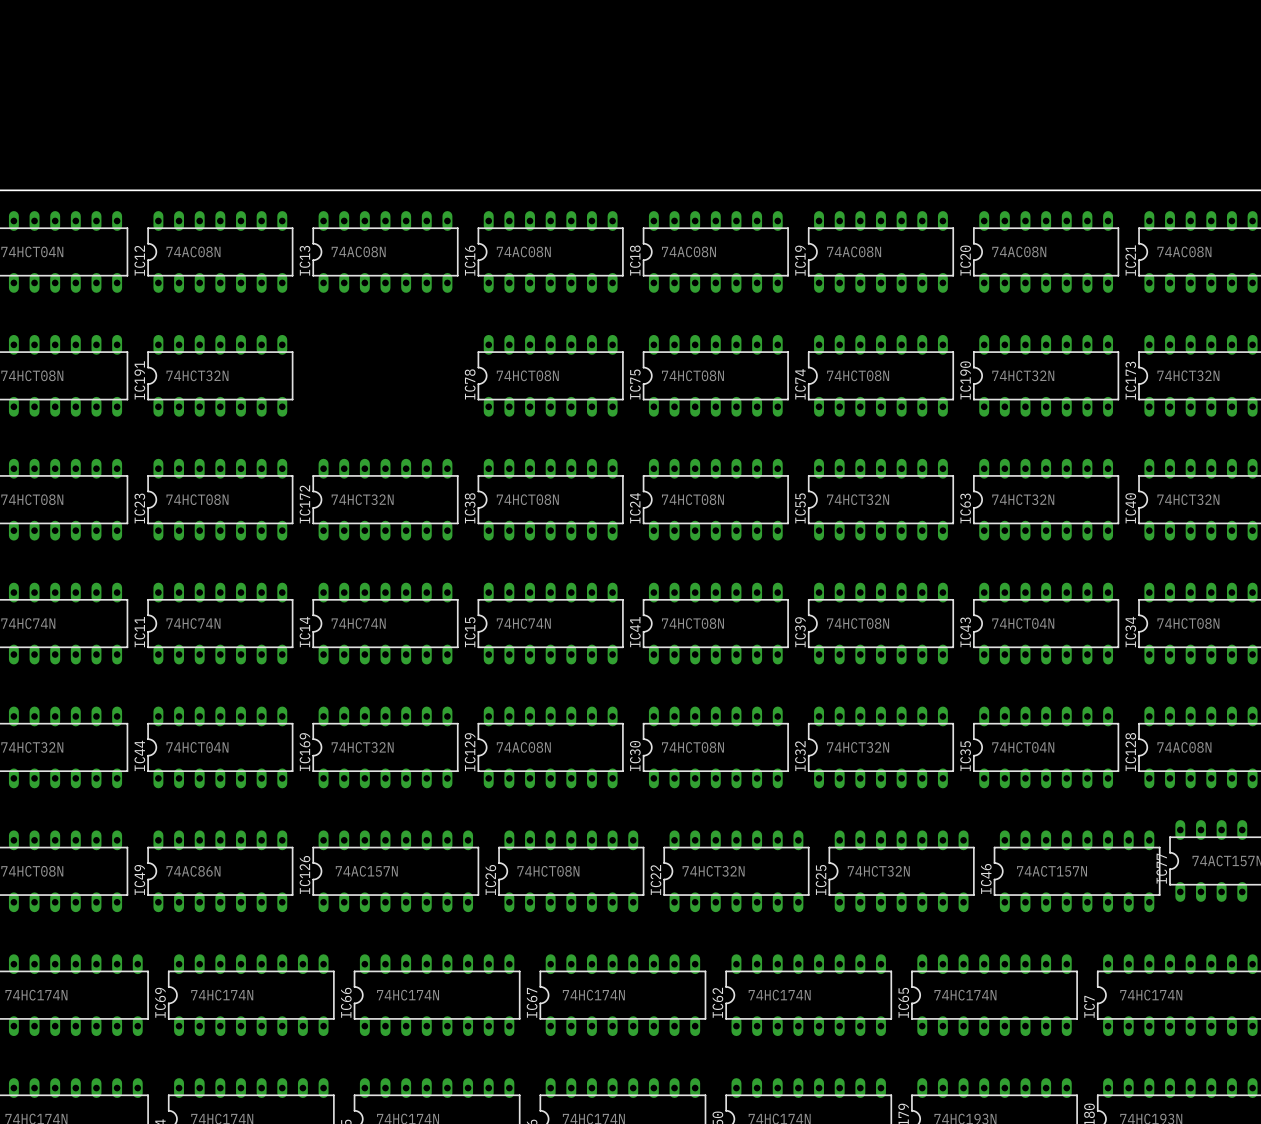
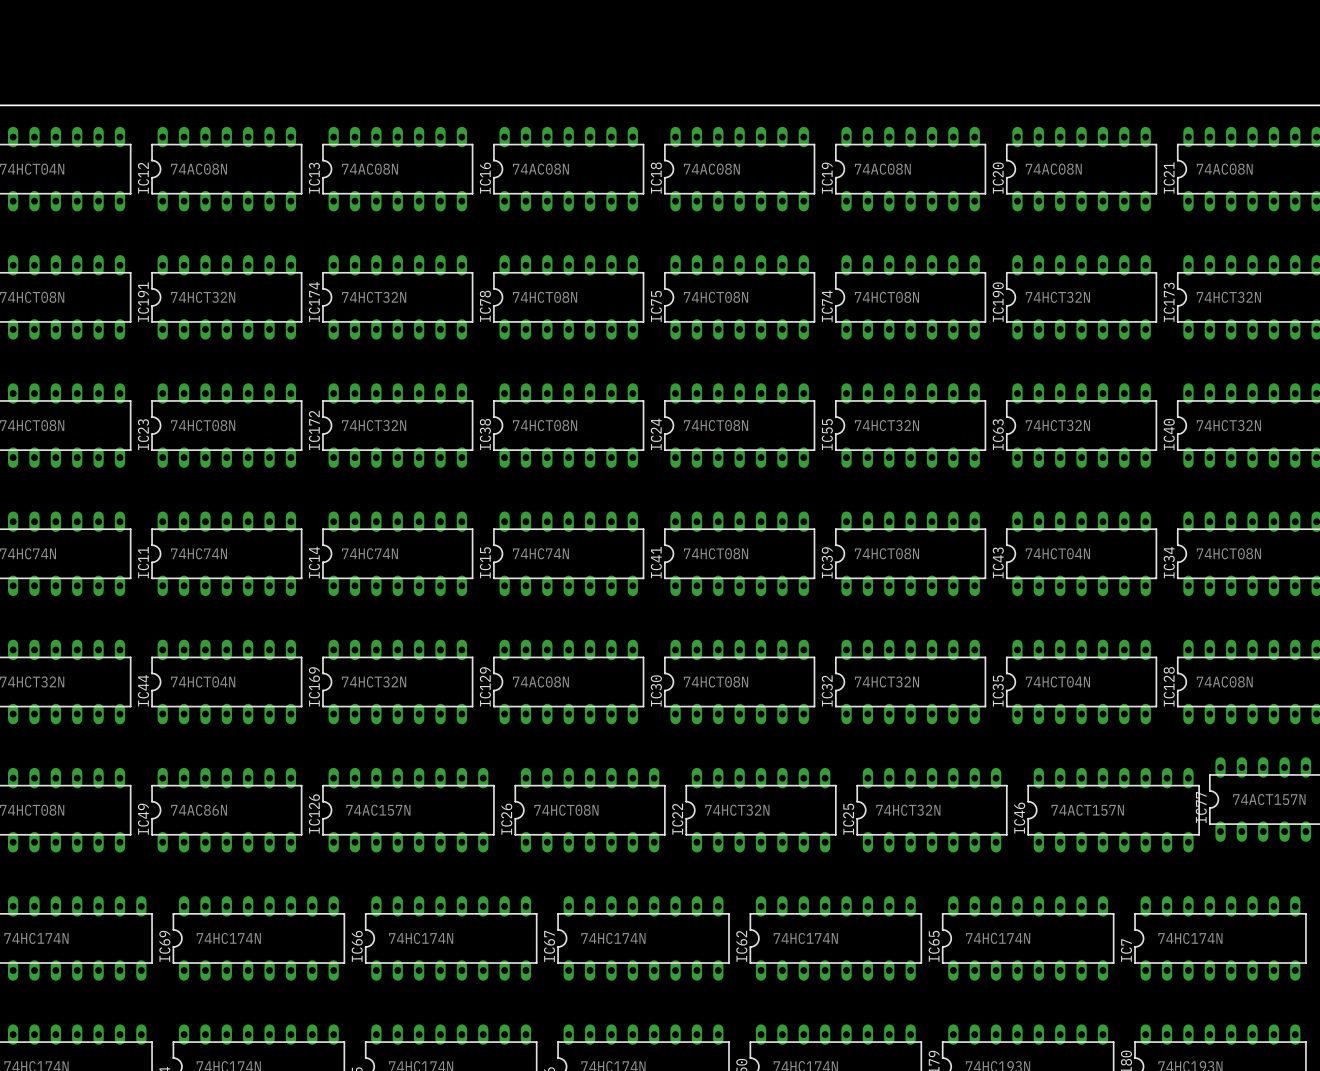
IC174: none -> 74HCT32N (397, 297)

